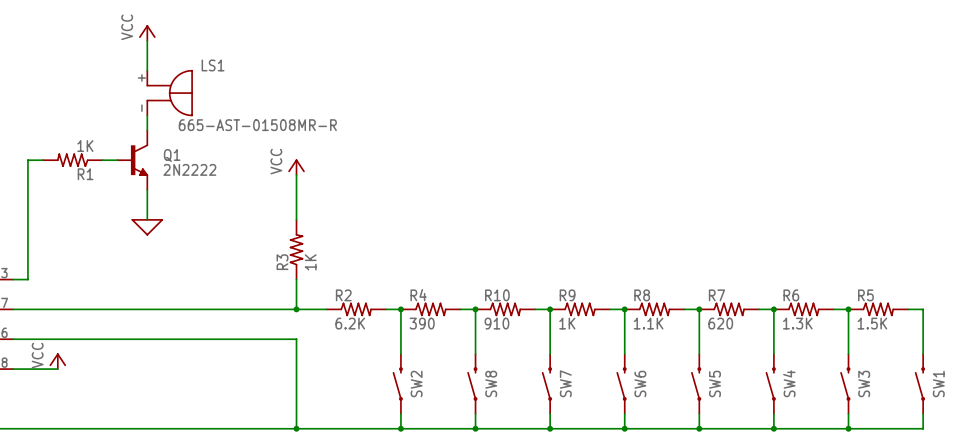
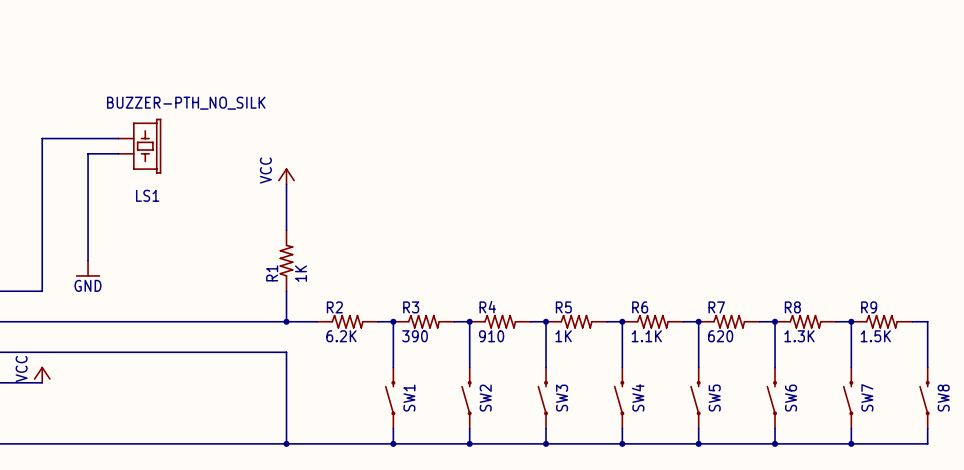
power symbol: VCC (147, 33) -> none
wire: (147, 40) (147, 70) -> none
LS1 name position: LS1 (213, 65) -> LS1 (147, 195)
LS1 symbol: [146, 69, 193, 117] -> [118, 118, 162, 174]
LS1 value: none -> BUZZER-PTH_NO_SILK (186, 103)
LS1 text: 665-AST-01508MR-R (257, 125) -> none
wire: none -> (118, 153) (88, 153) (88, 260)
wire: (42, 160) (27, 160) (27, 279) -> (118, 138) (42, 138) (42, 291) (11, 291)
R1: 1K (72, 160) -> none
wire: (102, 160) (117, 160) -> none
Q1: 2N2222 (132, 160) -> none
wire: (147, 190) (147, 219) -> none
power symbol: (147, 227) -> none
power symbol: none -> GND (88, 268)
R3 name: R3 (282, 262) -> R1 (272, 273)
R4 name: R4 (418, 295) -> R3 (411, 307)
R10 name: R10 (497, 295) -> R4 (487, 307)
R9 name: R9 (567, 295) -> R5 (563, 307)
R8 name: R8 (642, 295) -> R6 (640, 307)
R6 name: R6 (791, 295) -> R8 (792, 307)
R5 name: R5 (865, 295) -> R9 (869, 307)
SW2 name: SW2 (416, 383) -> SW1 (409, 398)
SW8 name: SW8 (491, 383) -> SW2 (485, 398)
SW7 name: SW7 (565, 383) -> SW3 (562, 398)
SW6 name: SW6 (640, 383) -> SW4 (638, 397)
SW4 name: SW4 (789, 383) -> SW6 (791, 398)
SW3 name: SW3 (864, 383) -> SW7 (867, 397)
SW1 name: SW1 (938, 383) -> SW8 (943, 398)

